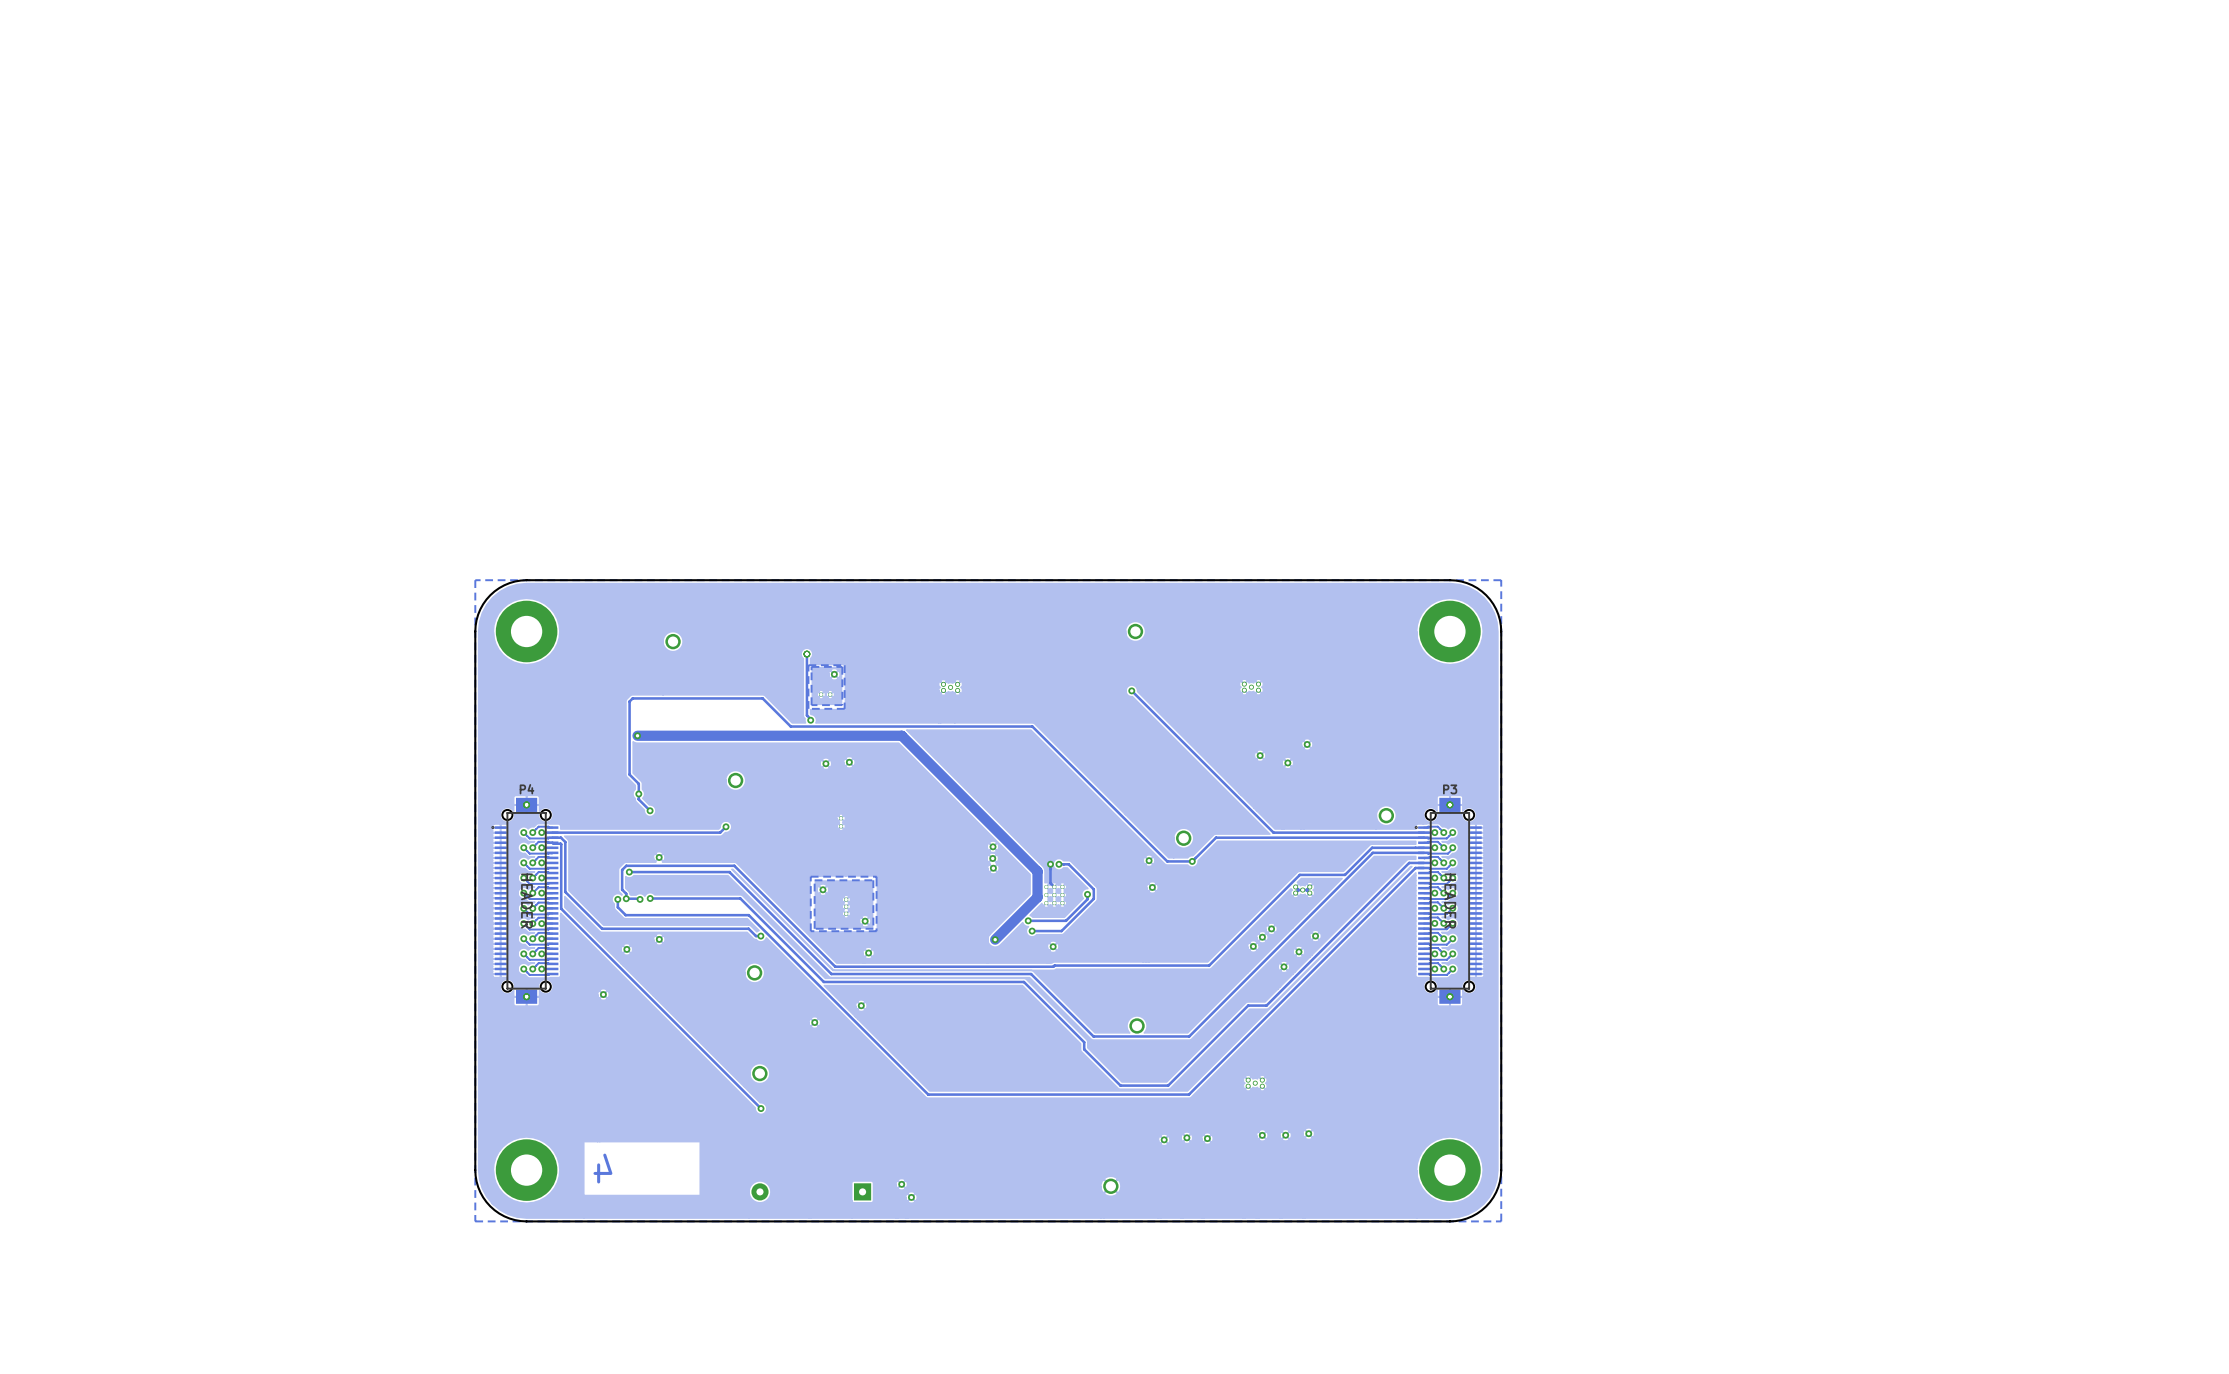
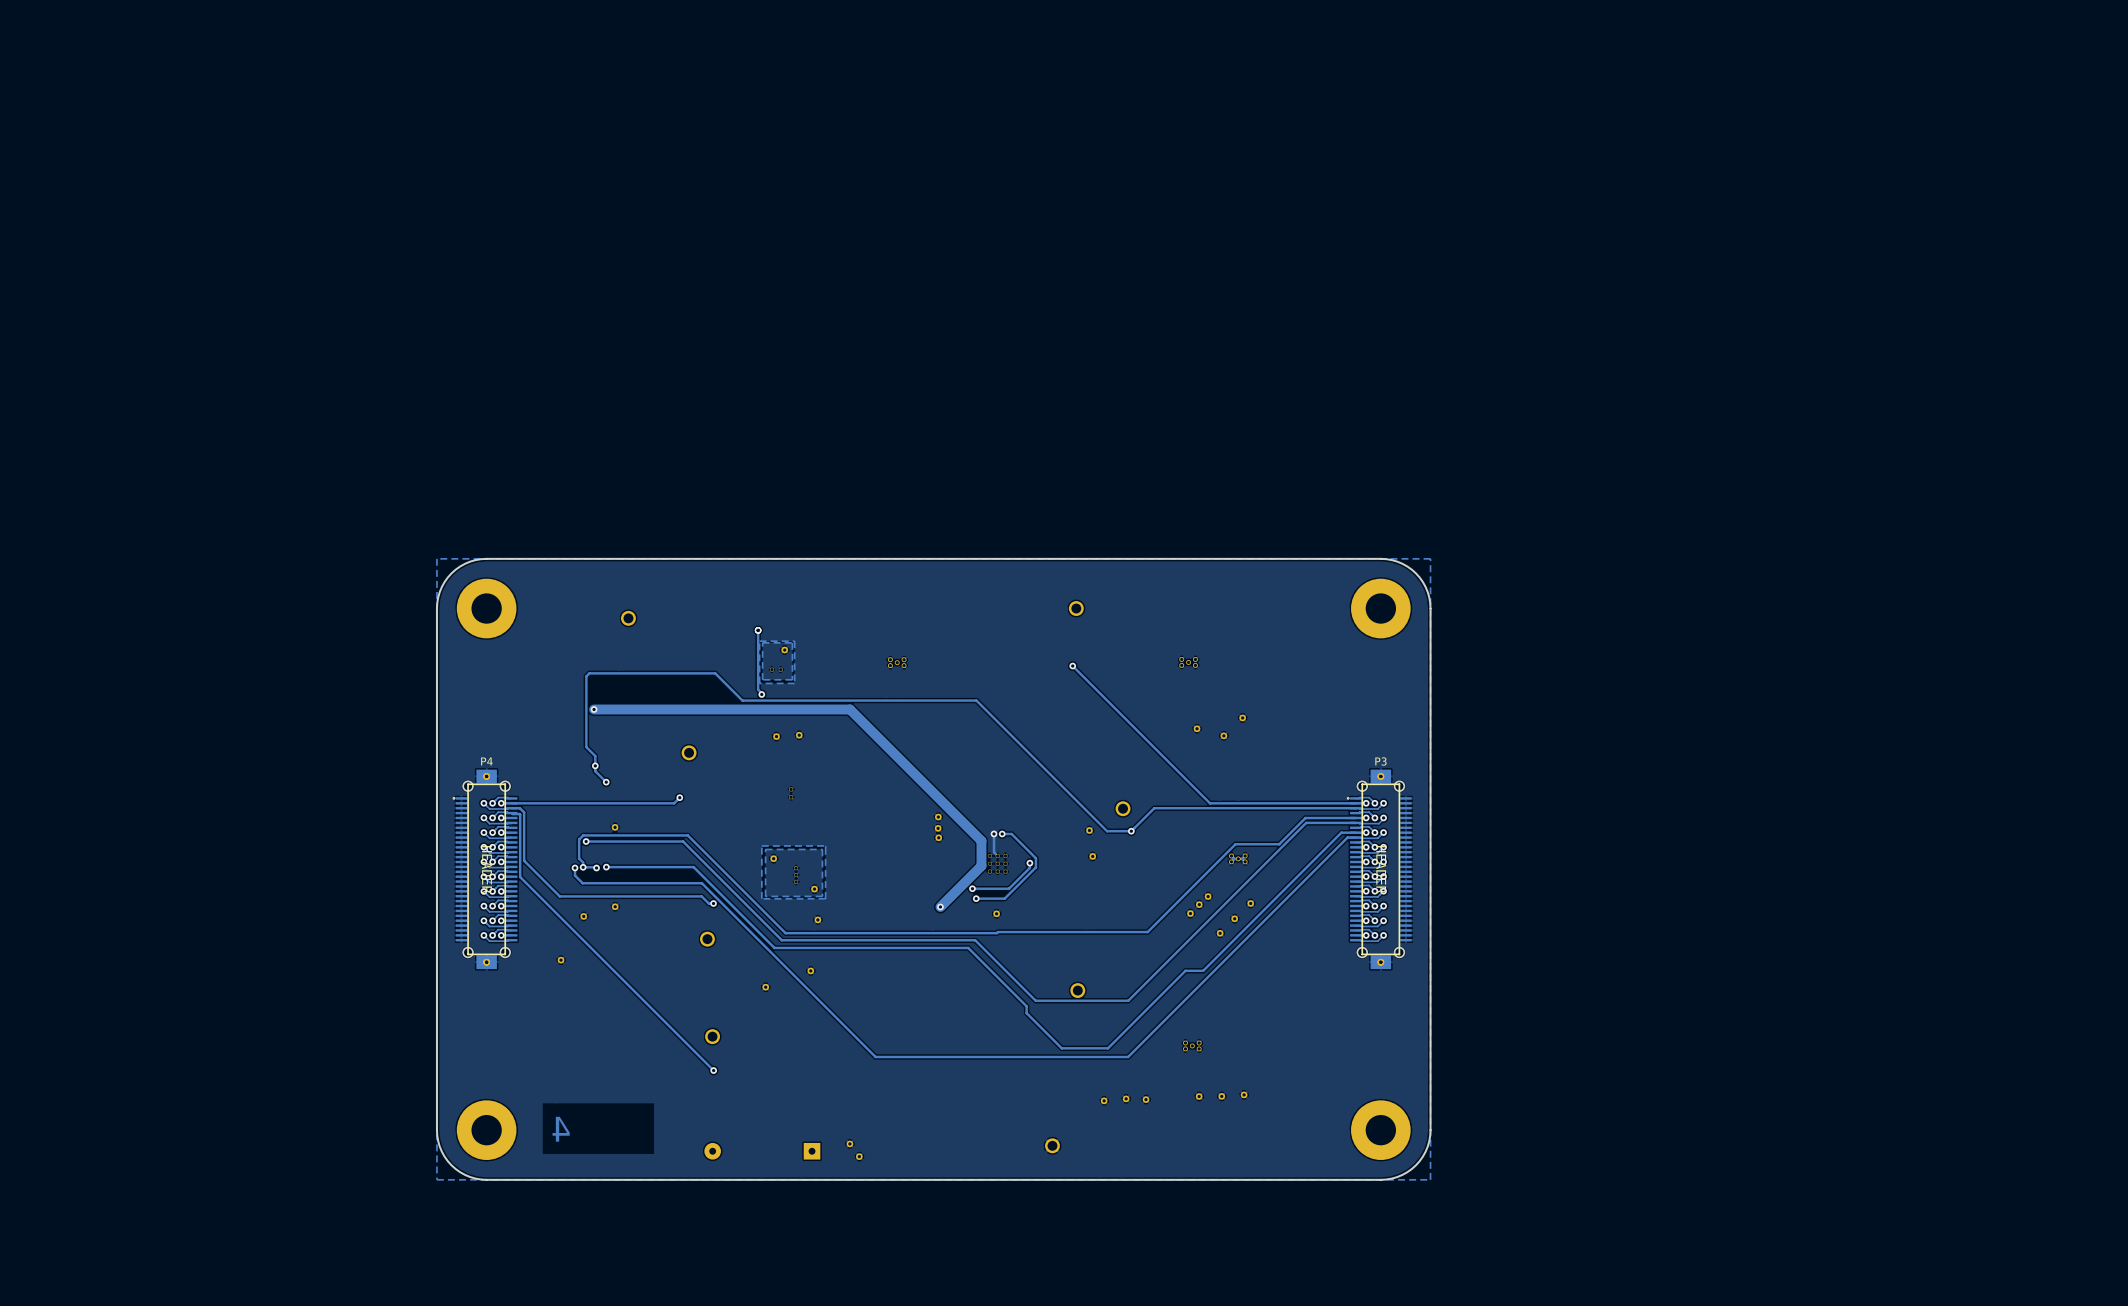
part: (1386, 815) -> none

